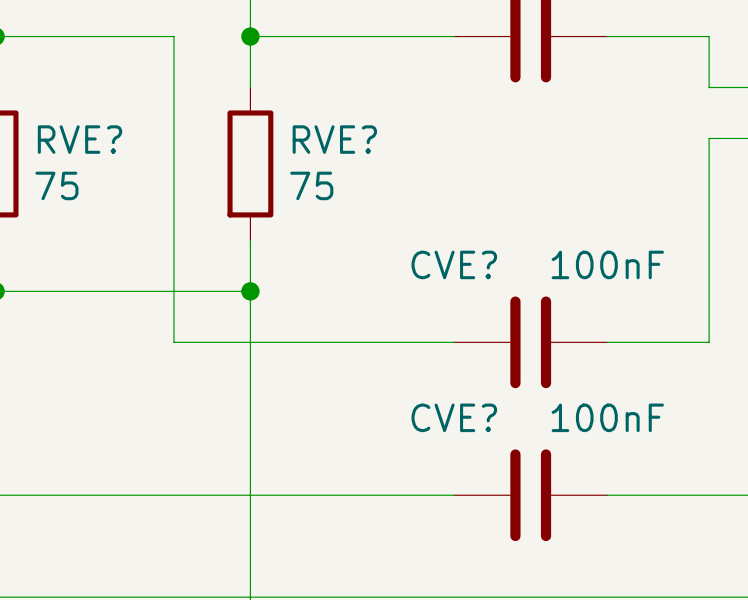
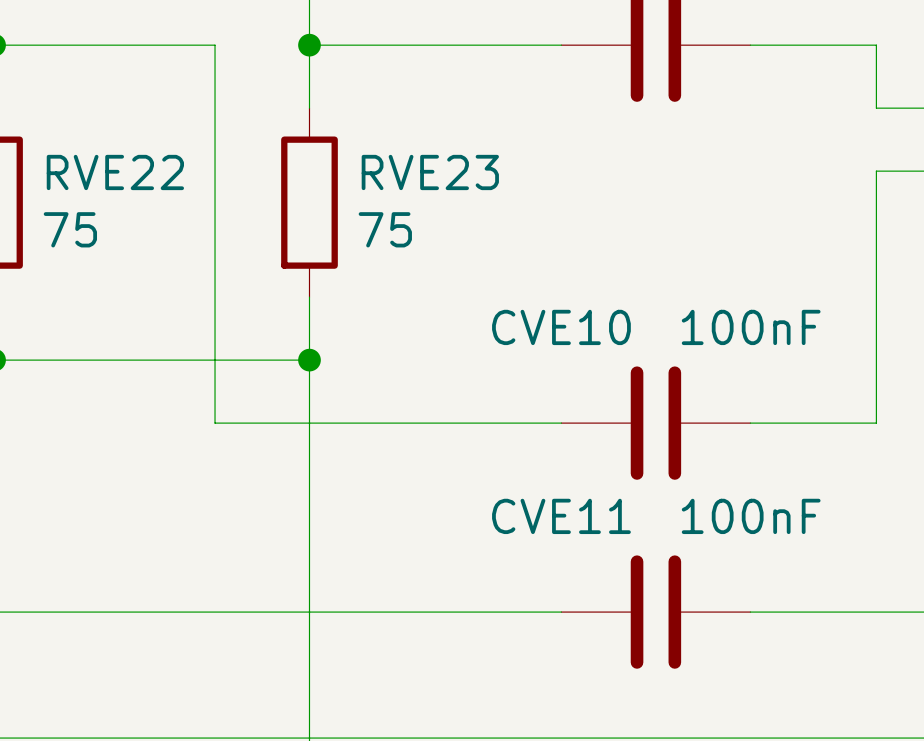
RVE? name: RVE? (79, 139) -> RVE22 (115, 172)
RVE? name: RVE? (334, 139) -> RVE23 (430, 172)
CVE? name: CVE? (454, 264) -> CVE10 (561, 327)
CVE? name: CVE? (454, 417) -> CVE11 (561, 516)

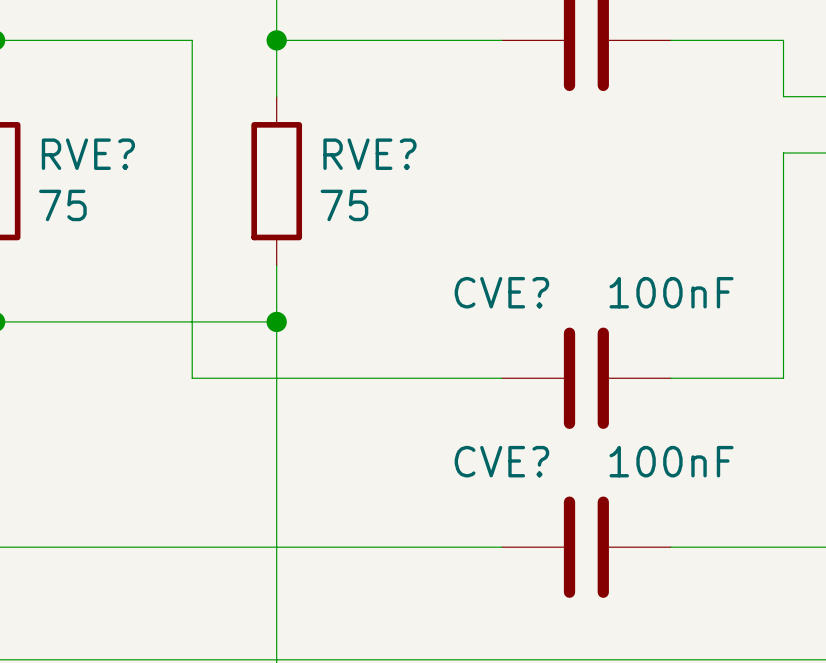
RVE22 name: RVE22 (115, 172) -> RVE? (88, 154)
RVE23 name: RVE23 (430, 172) -> RVE? (369, 154)
CVE10 name: CVE10 (561, 327) -> CVE? (501, 292)
CVE11 name: CVE11 (561, 516) -> CVE? (501, 461)

